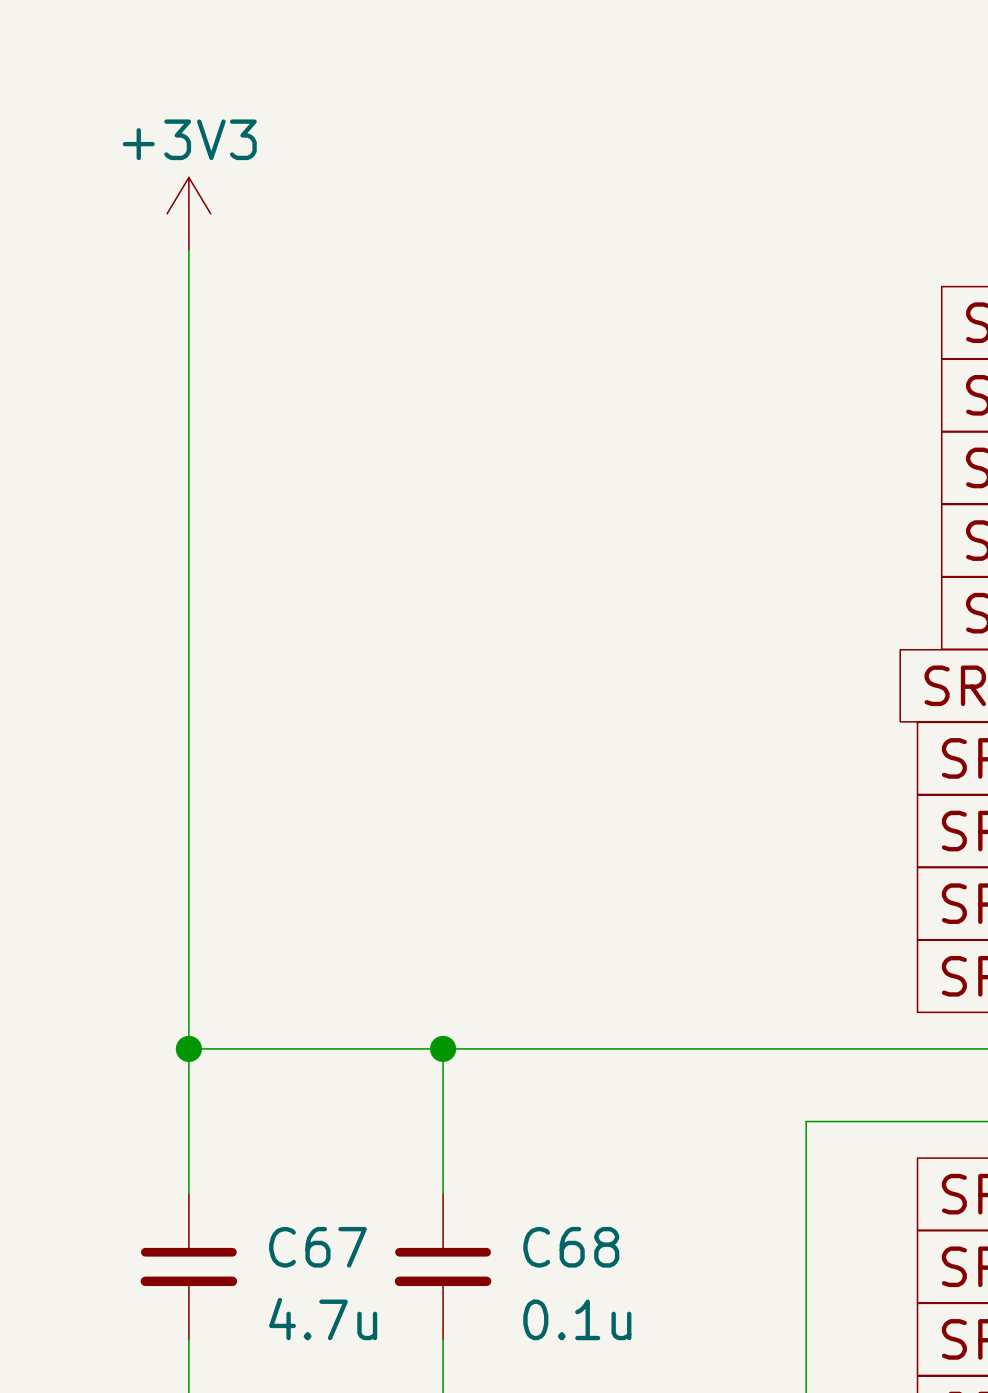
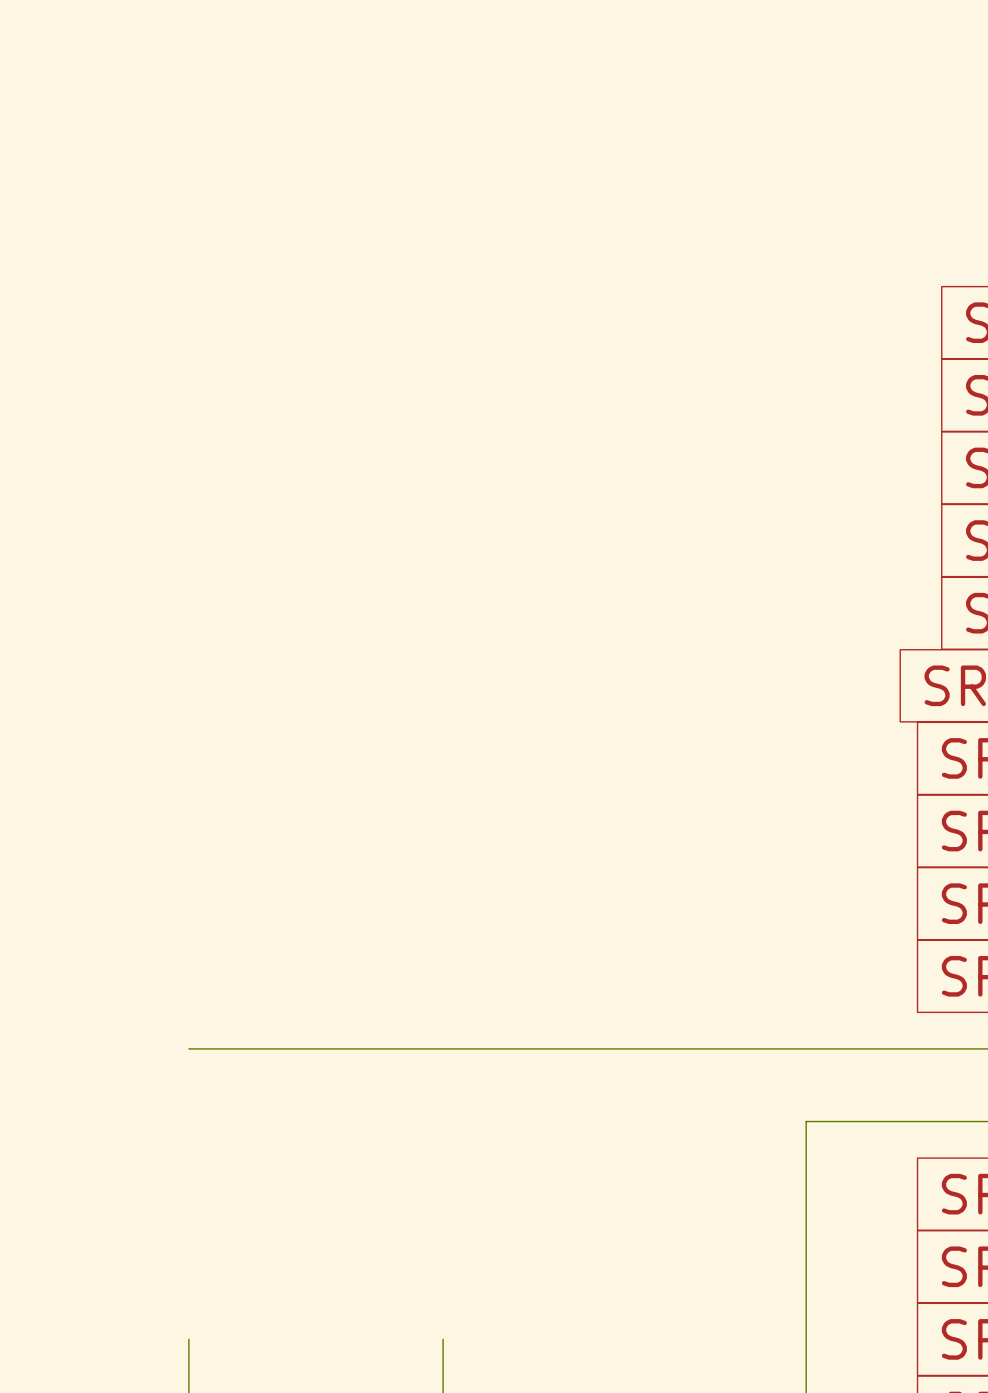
power symbol: +3V3 (188, 213) -> none
wire: (188, 250) (188, 1194) -> none
junction: (188, 1048) -> none
wire: (443, 1048) (443, 1194) -> none
junction: (443, 1048) -> none
C67: 4.7u (188, 1266) -> none
C68: 0.1u (443, 1266) -> none

